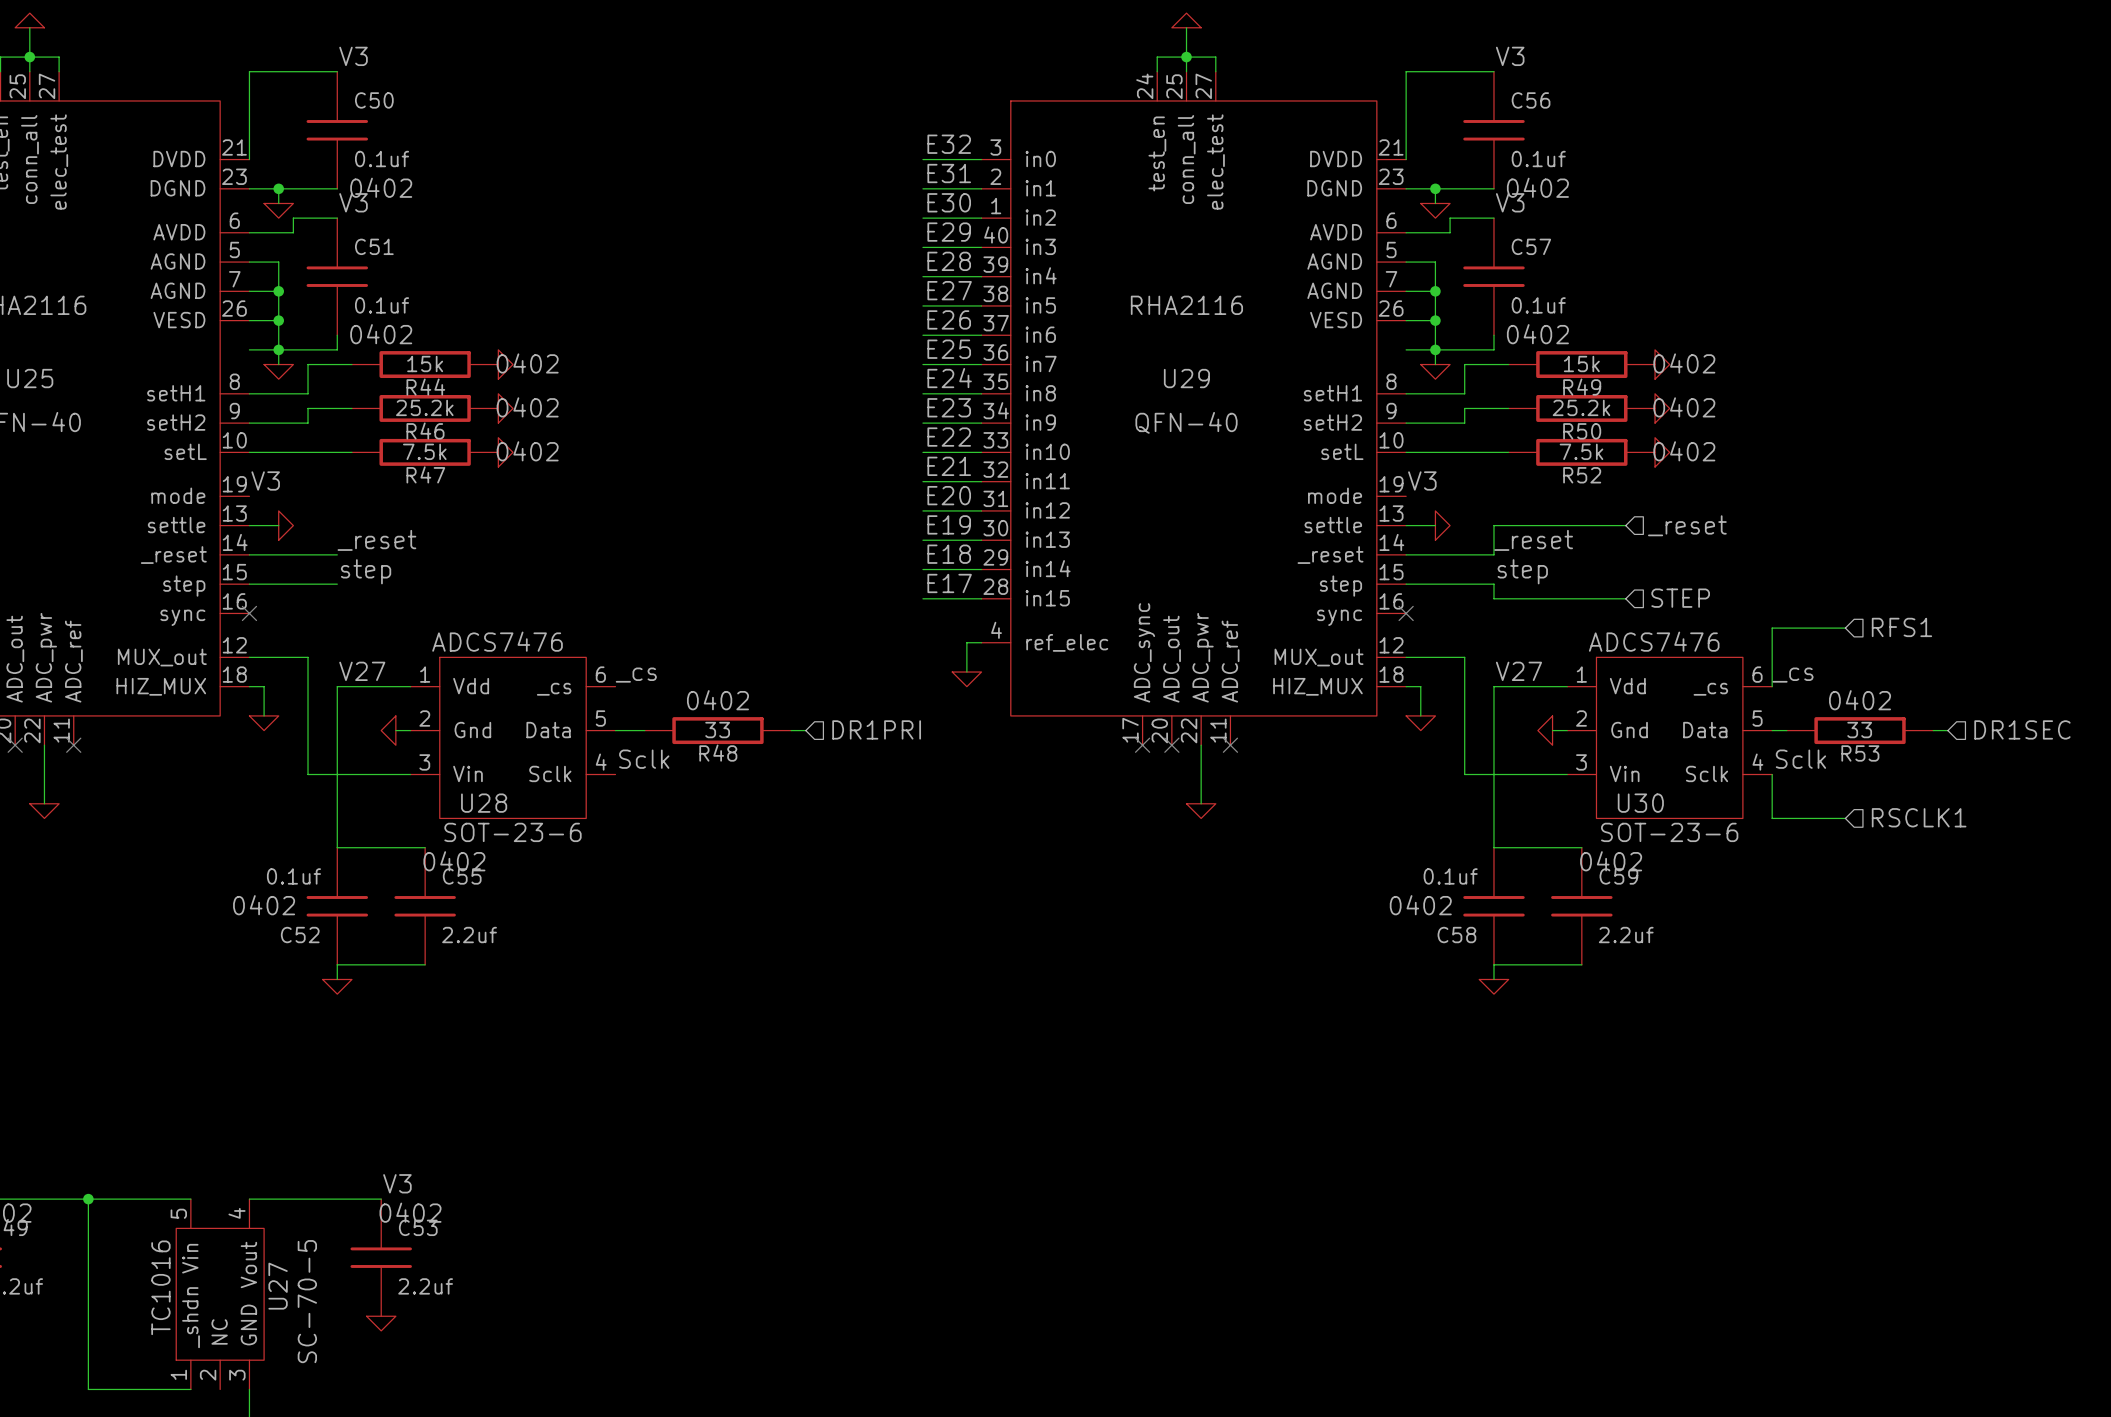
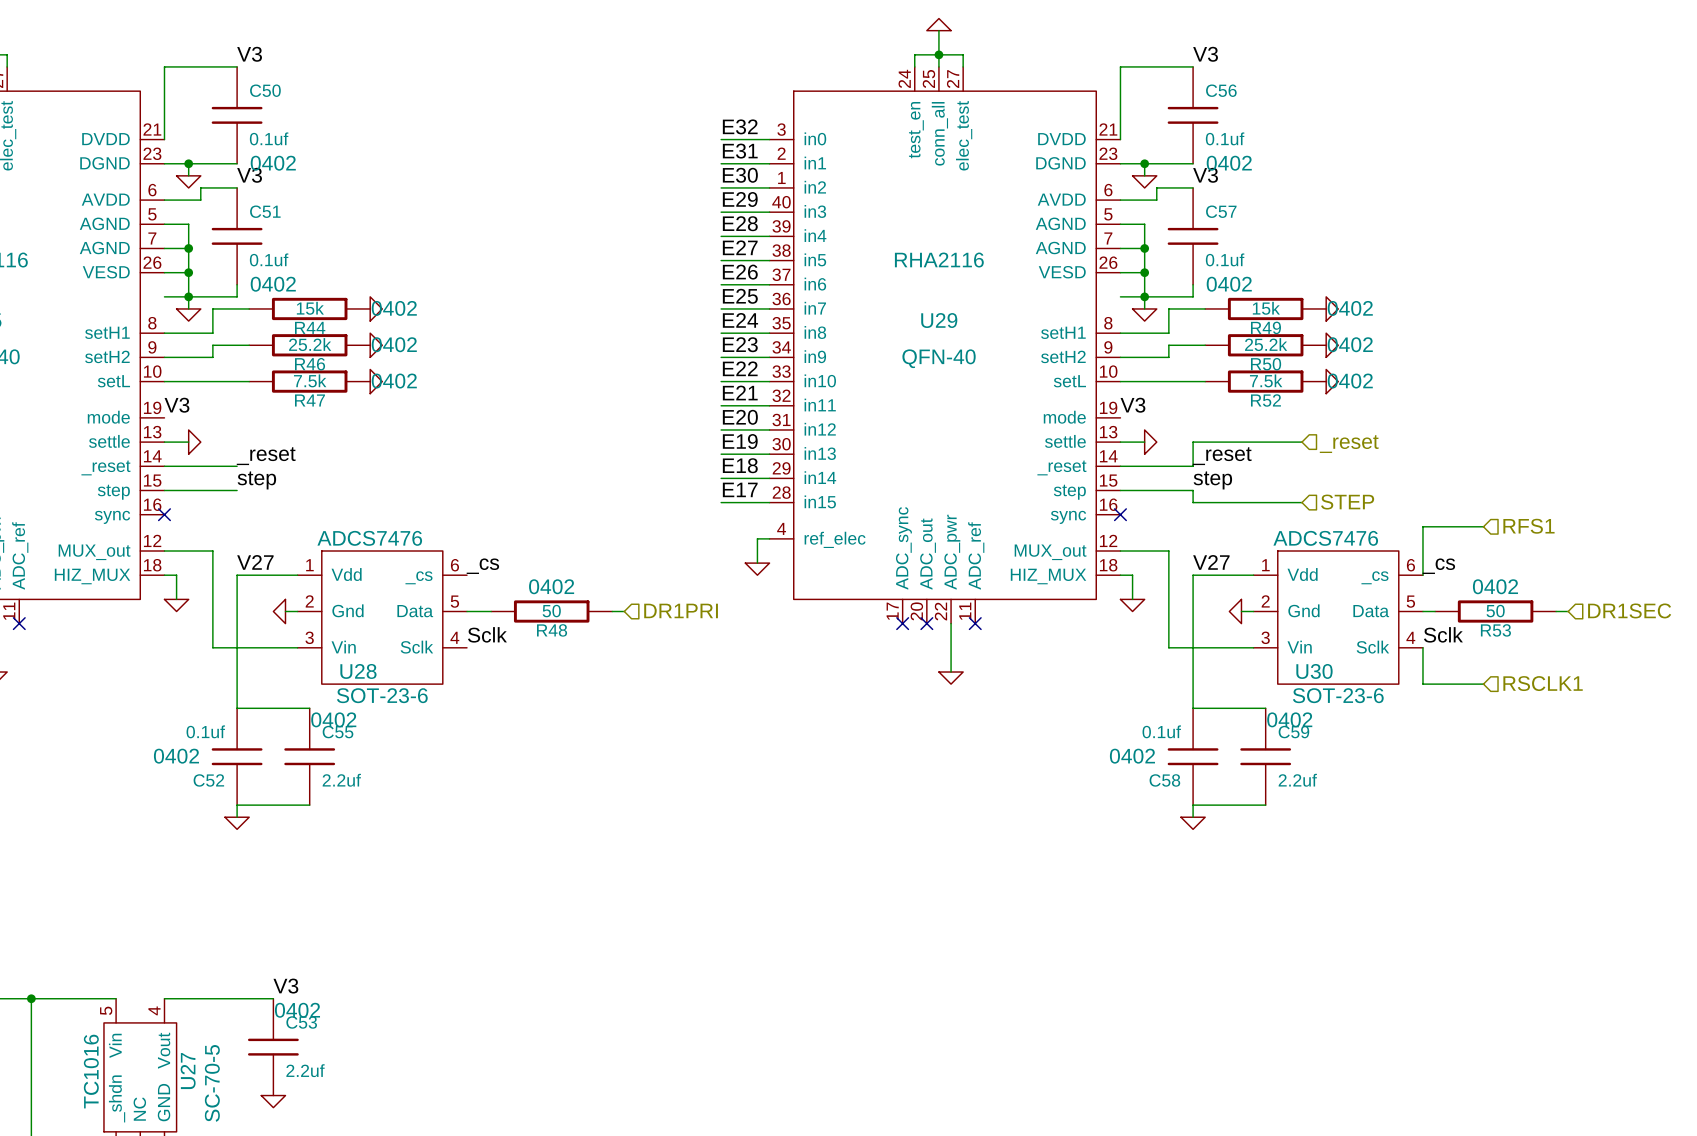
R48 value: 33 (717, 730) -> 50 (551, 611)
R53 value: 33 (1859, 730) -> 50 (1495, 611)

